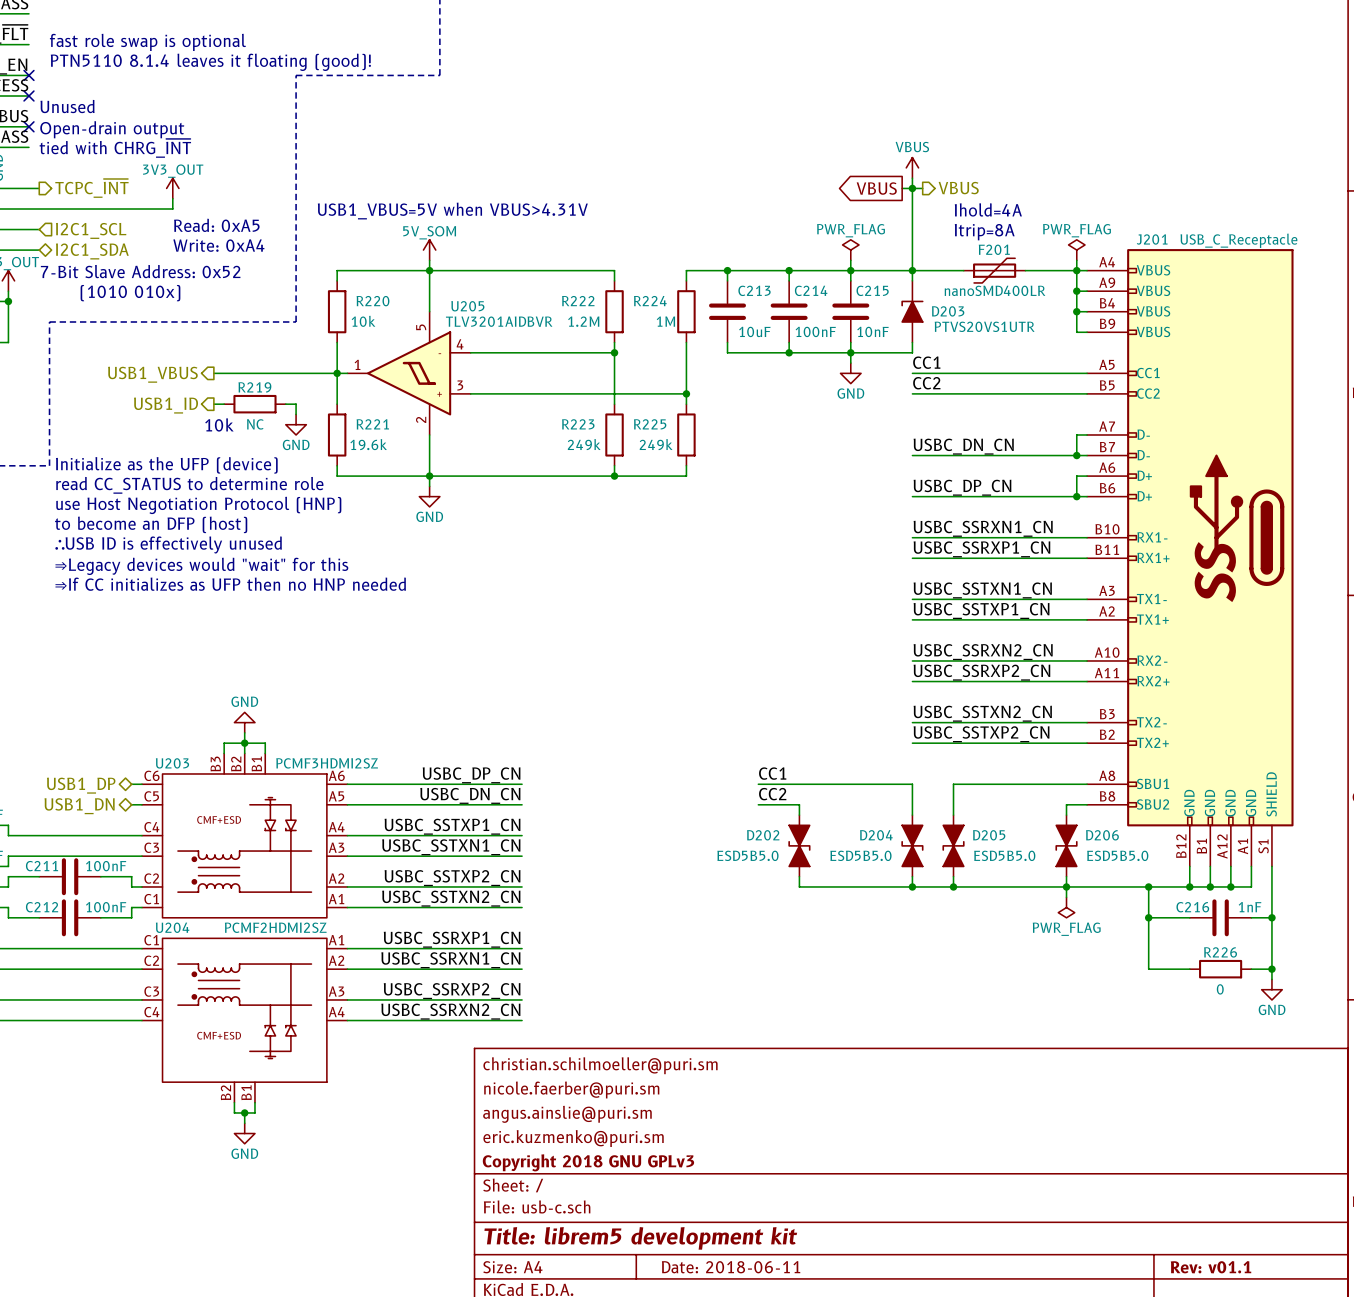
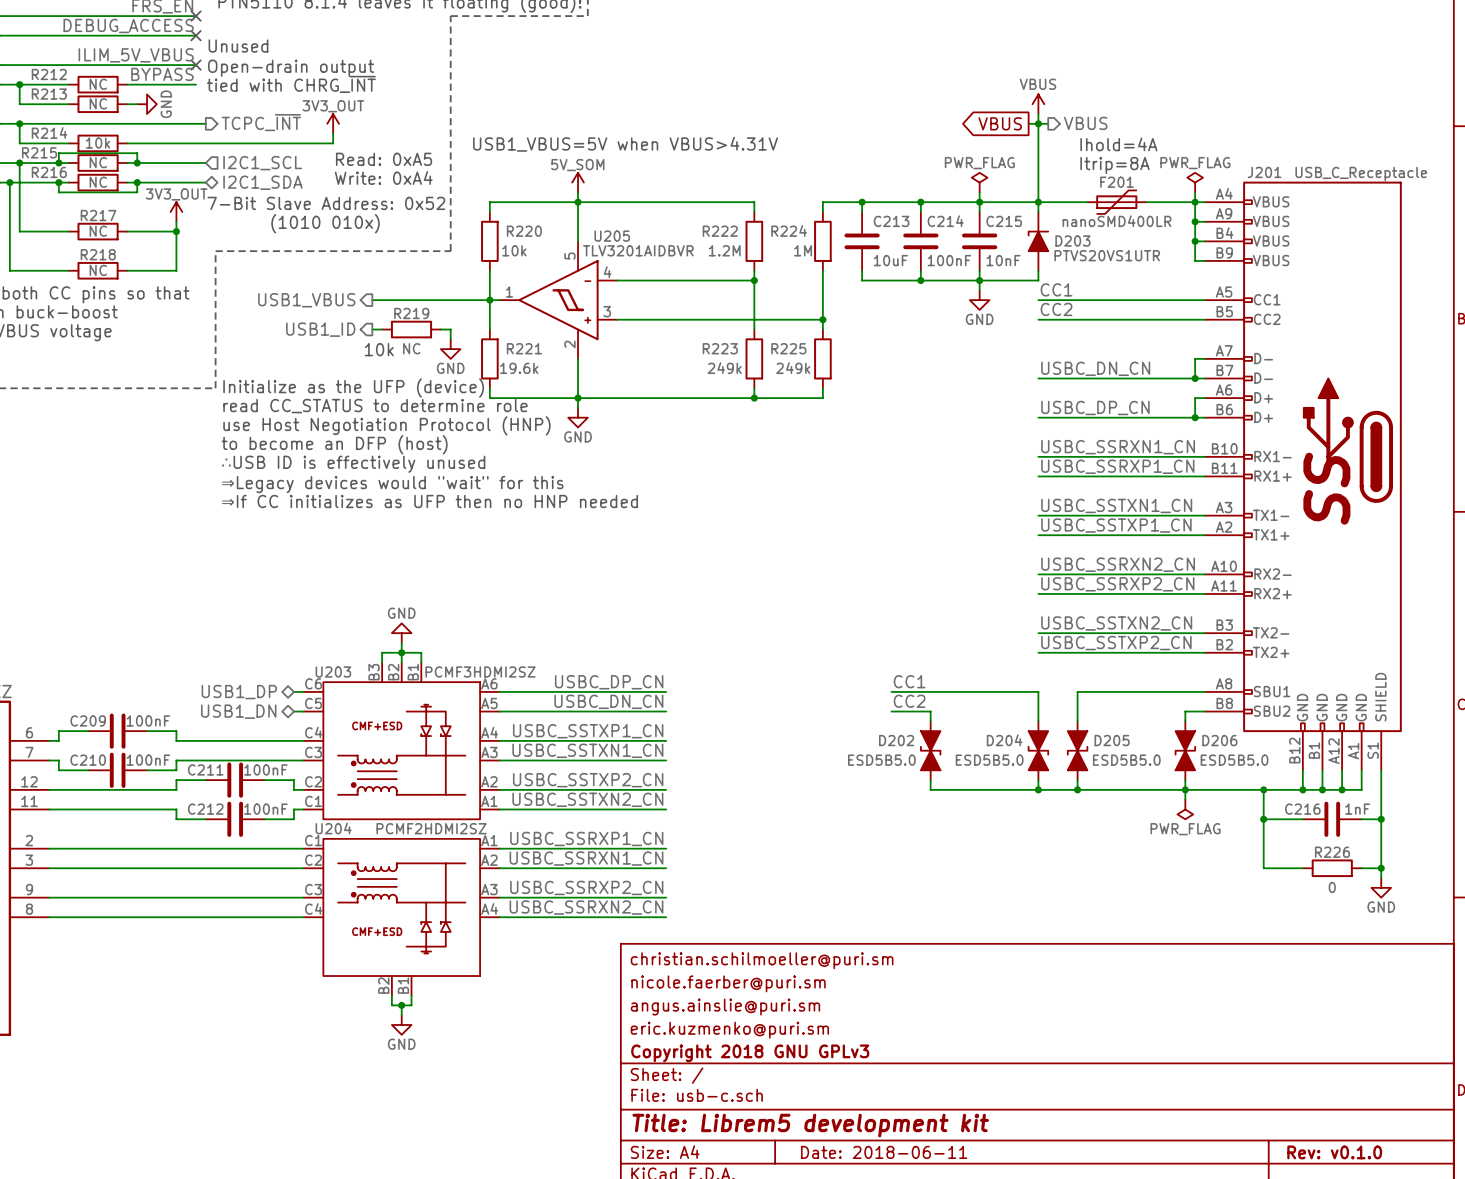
title block: Title: librem5 development kit (640, 1238) -> Title: Librem5 development kit (810, 1125)
title block: Rev: v01.1 (1211, 1267) -> Rev: v0.1.0 (1334, 1152)

